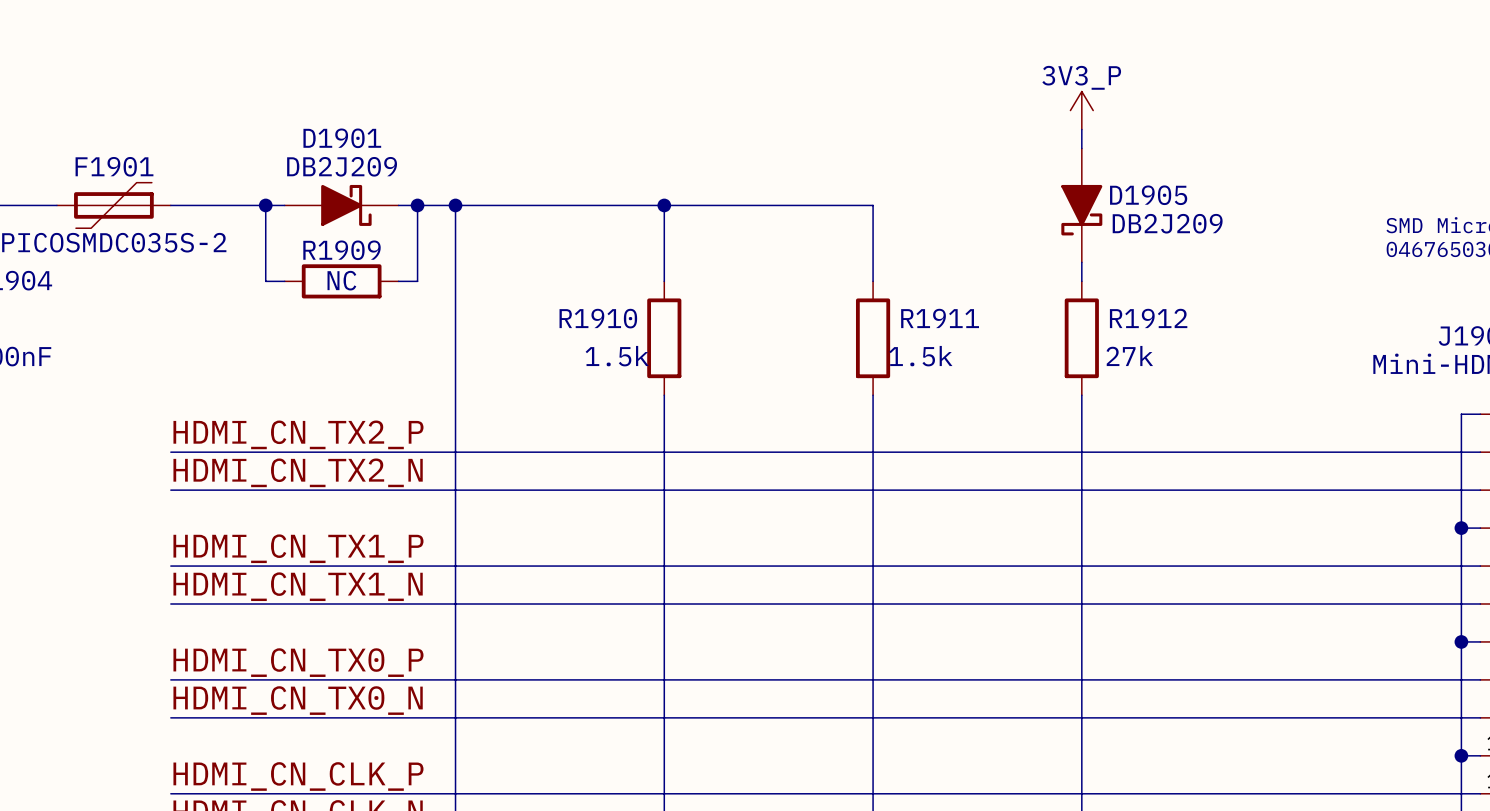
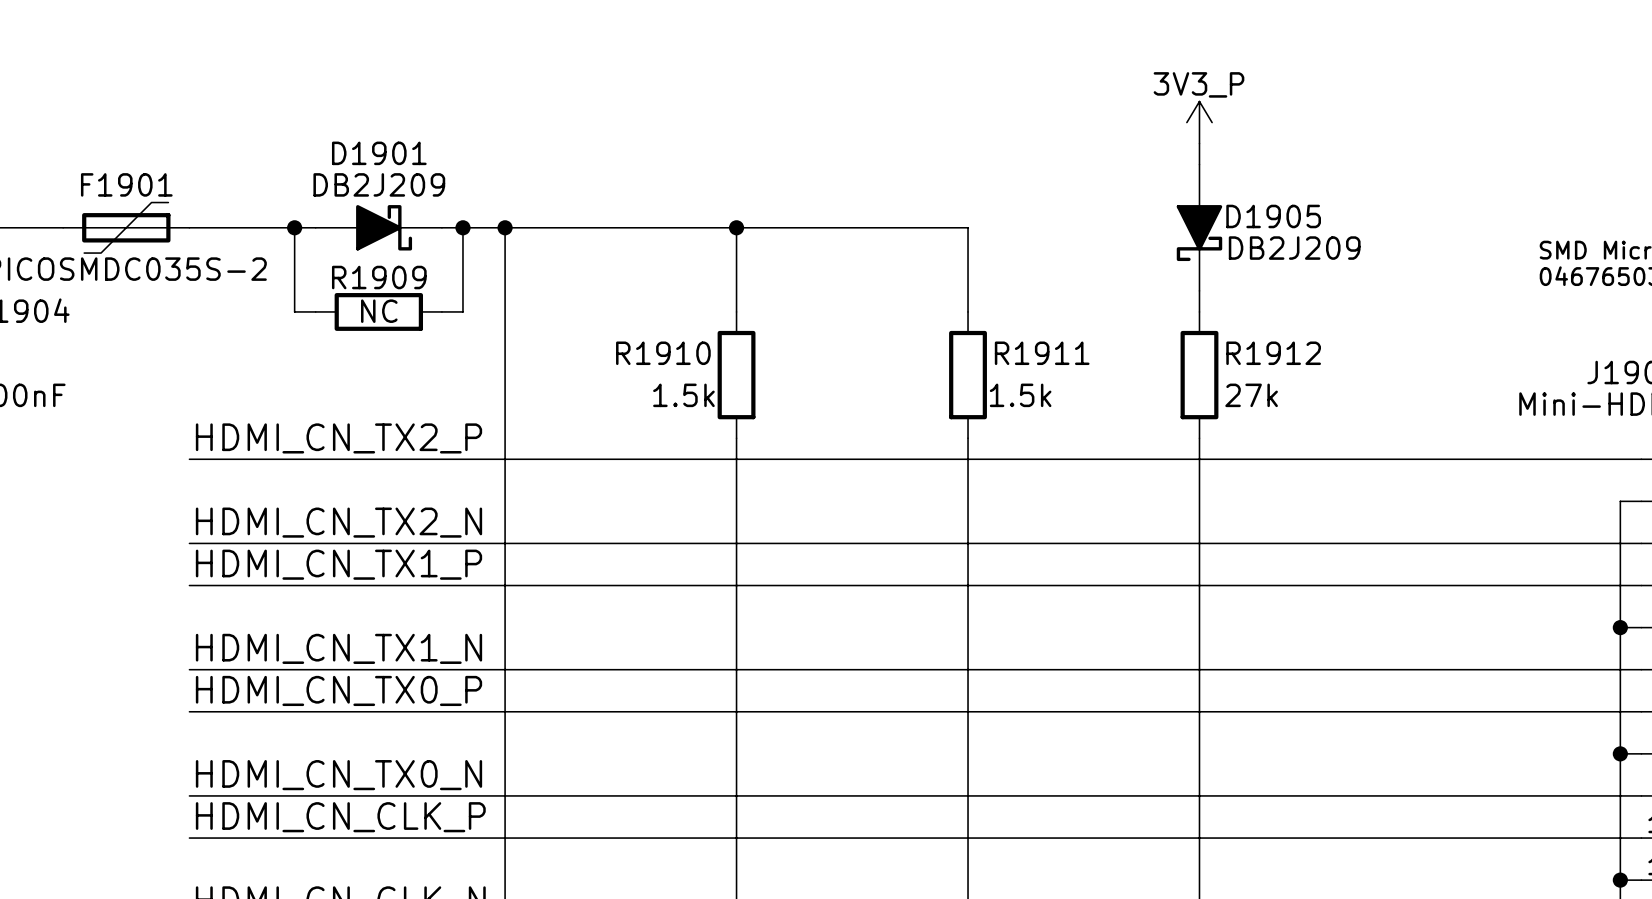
wire: (1461, 414) (1461, 452) (170, 452) -> (1620, 459) (189, 459)
label position: HDMI_CN_TX2_P (298, 434) -> HDMI_CN_TX2_P (338, 438)
junction: (1461, 528) -> none
label position: HDMI_CN_TX1_P (298, 548) -> HDMI_CN_TX1_P (338, 564)
wire: (170, 566) (1461, 566) -> (189, 585) (1620, 585)
junction: none -> (1620, 627)
junction: (1461, 641) -> none
label position: HDMI_CN_TX0_P (298, 662) -> HDMI_CN_TX0_P (338, 690)
wire: (170, 679) (1461, 679) -> (189, 711) (1620, 711)
junction: none -> (1620, 753)
junction: (1461, 755) -> none
label position: HDMI_CN_CLK_P (298, 776) -> HDMI_CN_CLK_P (340, 817)
wire: (170, 793) (1461, 793) -> (189, 838) (1620, 838)
junction: none -> (1620, 880)

